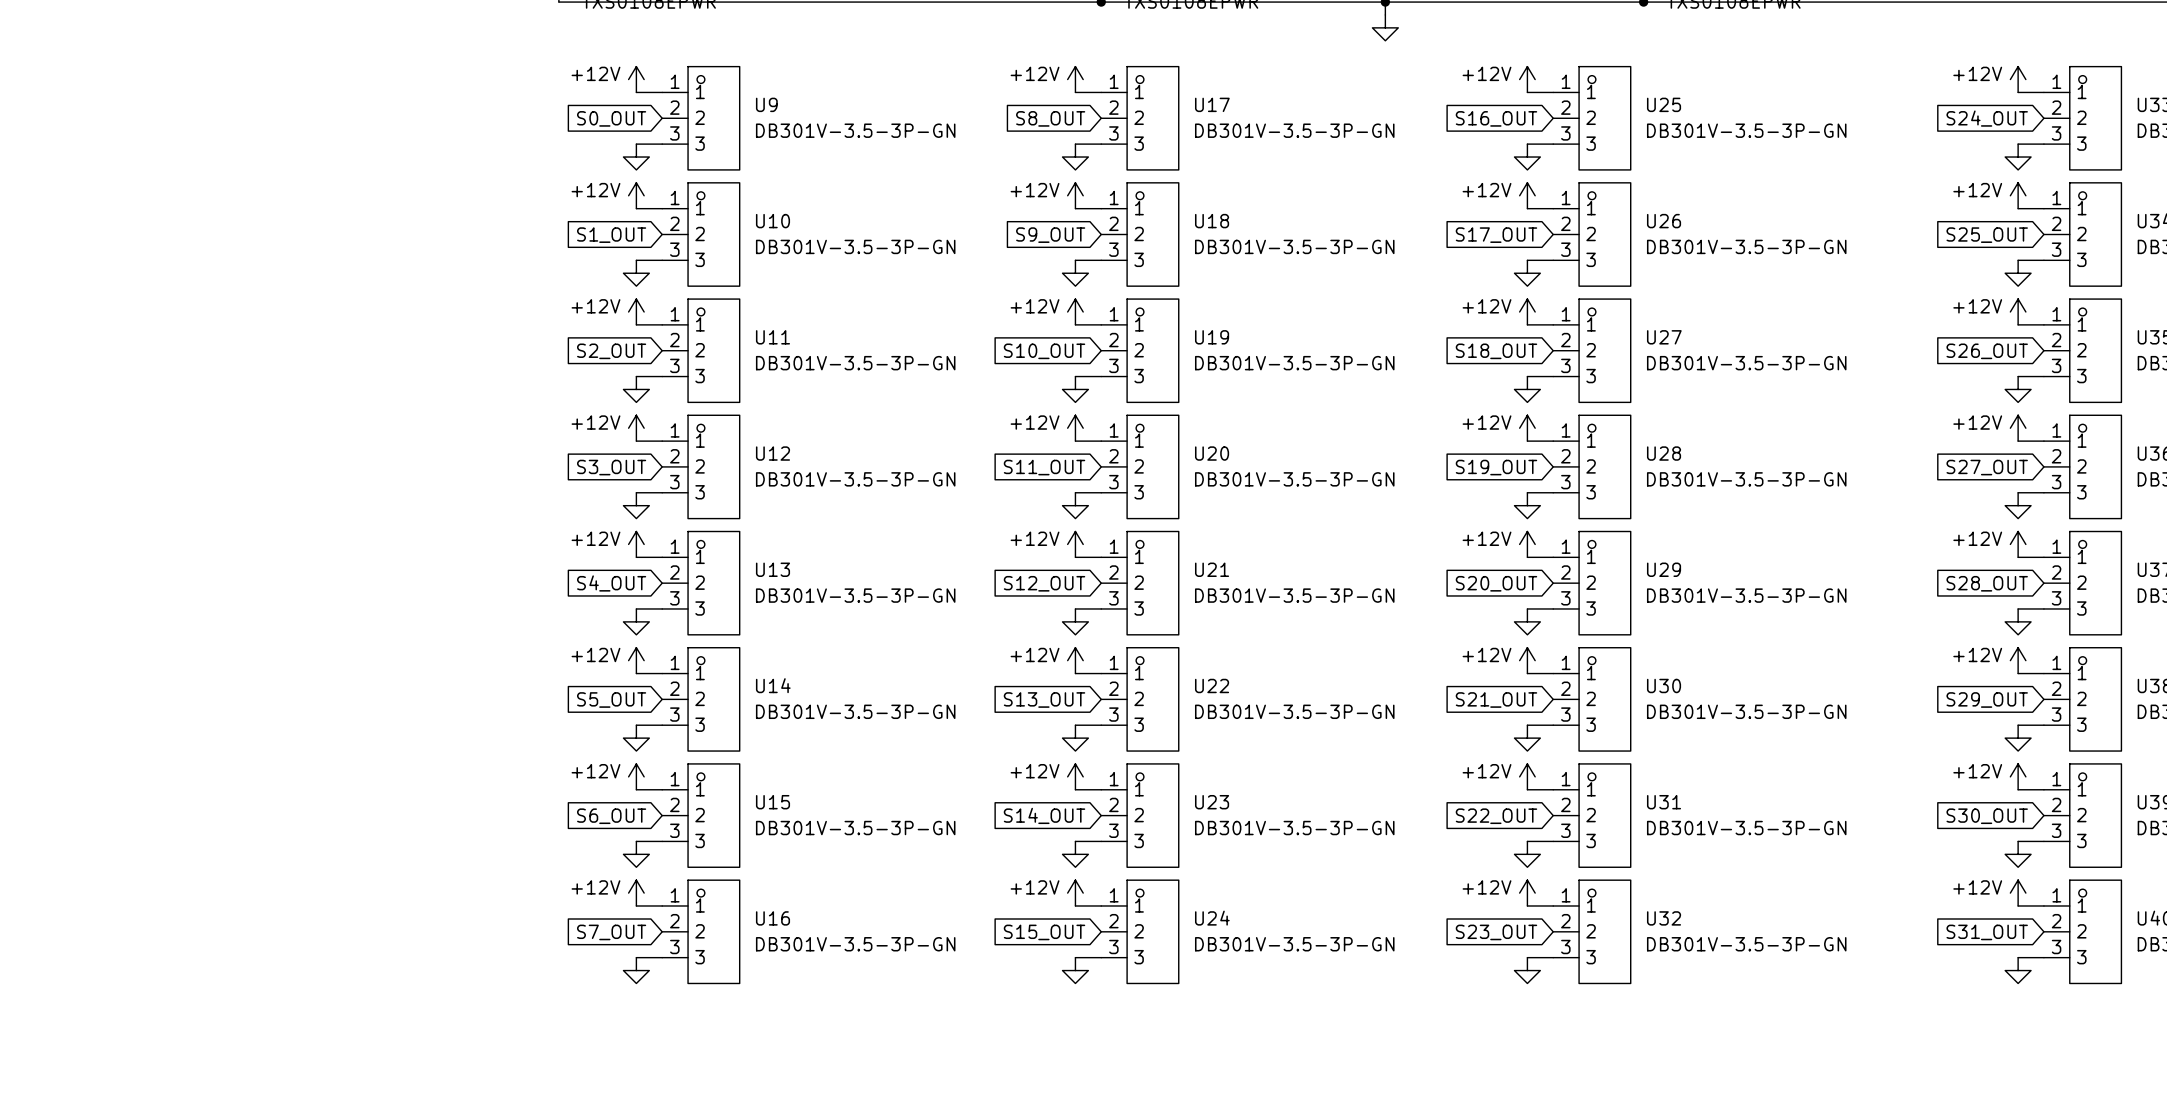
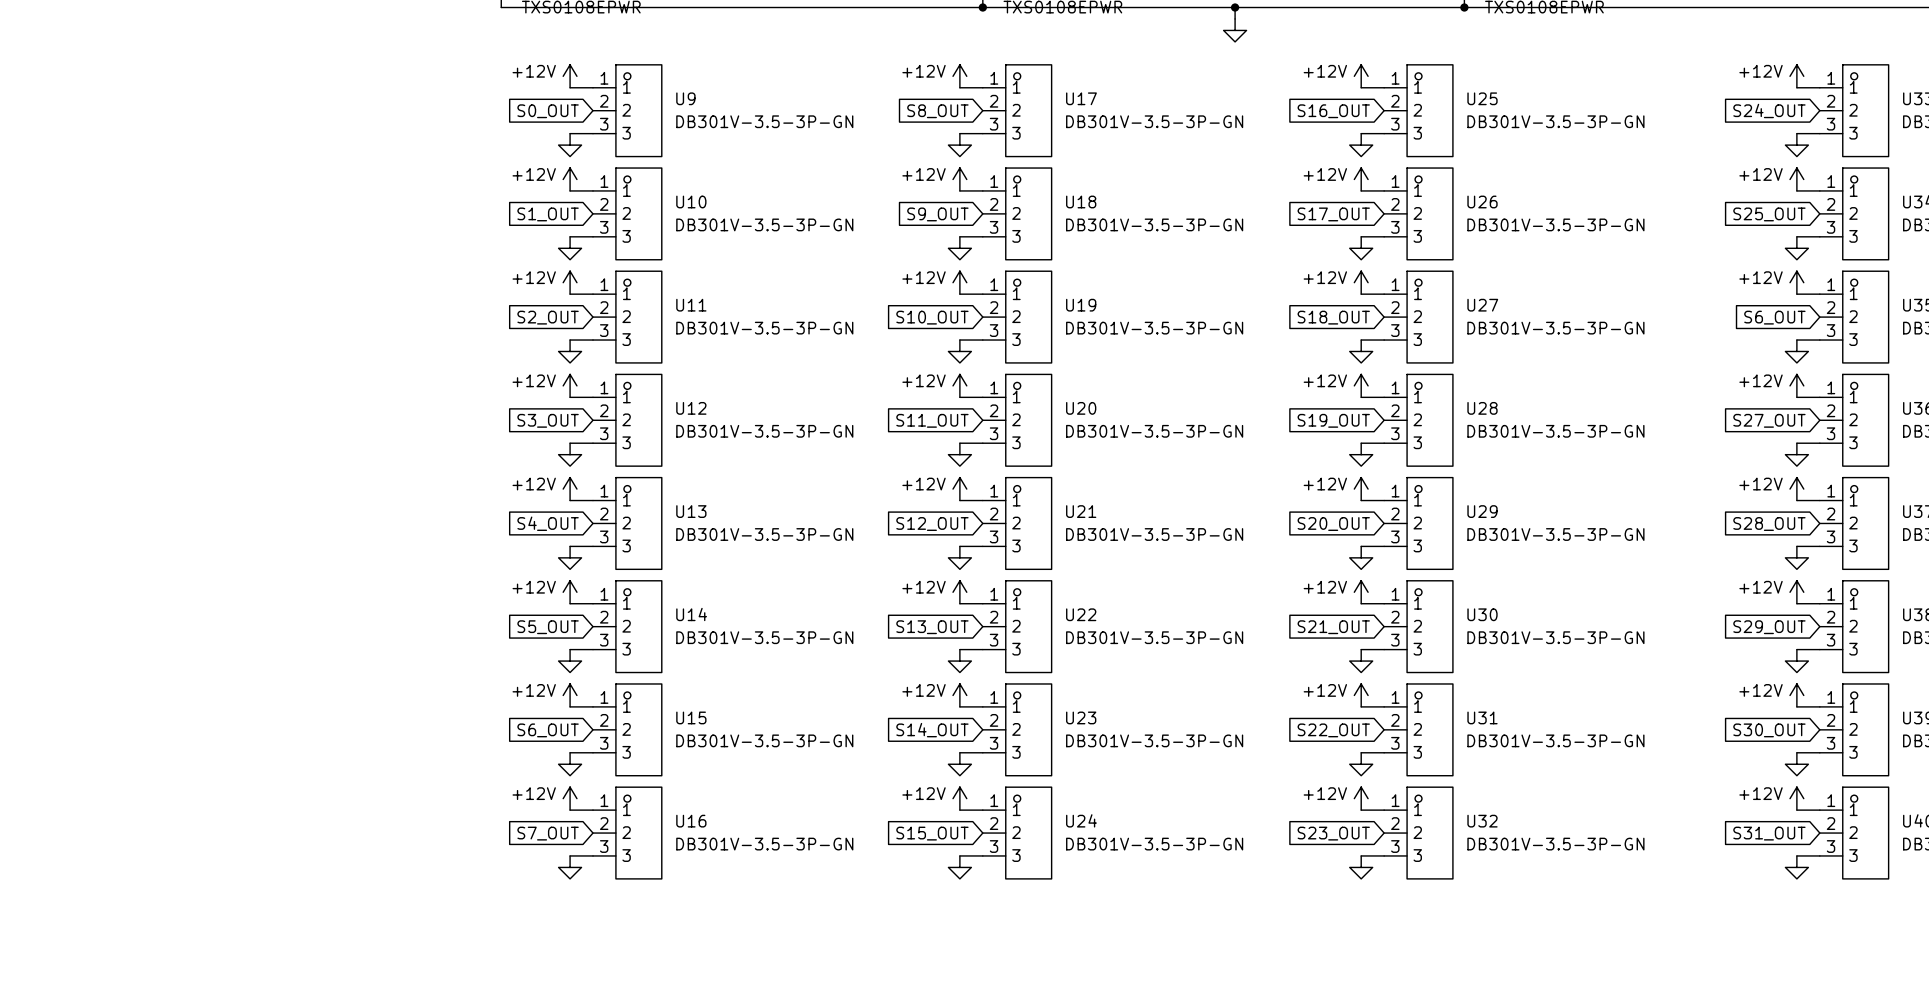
global label: S26_OUT (1987, 351) -> S6_OUT (1774, 317)

